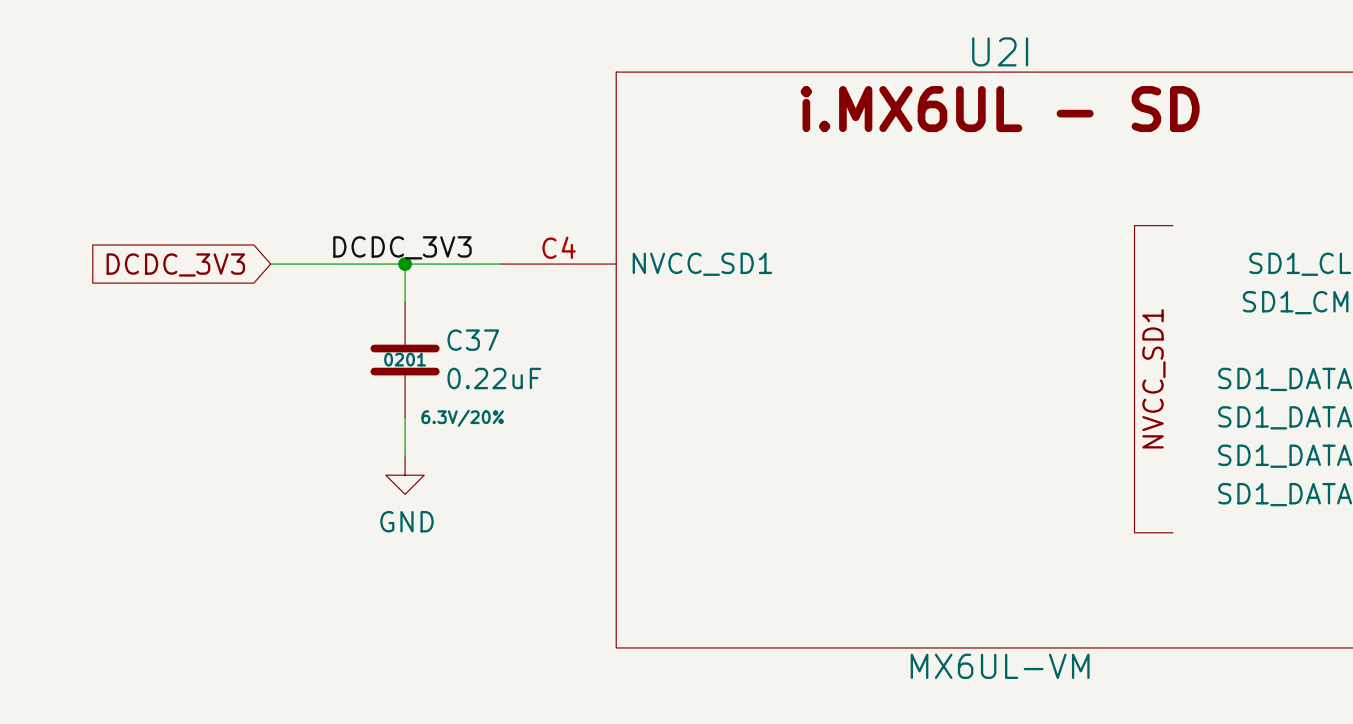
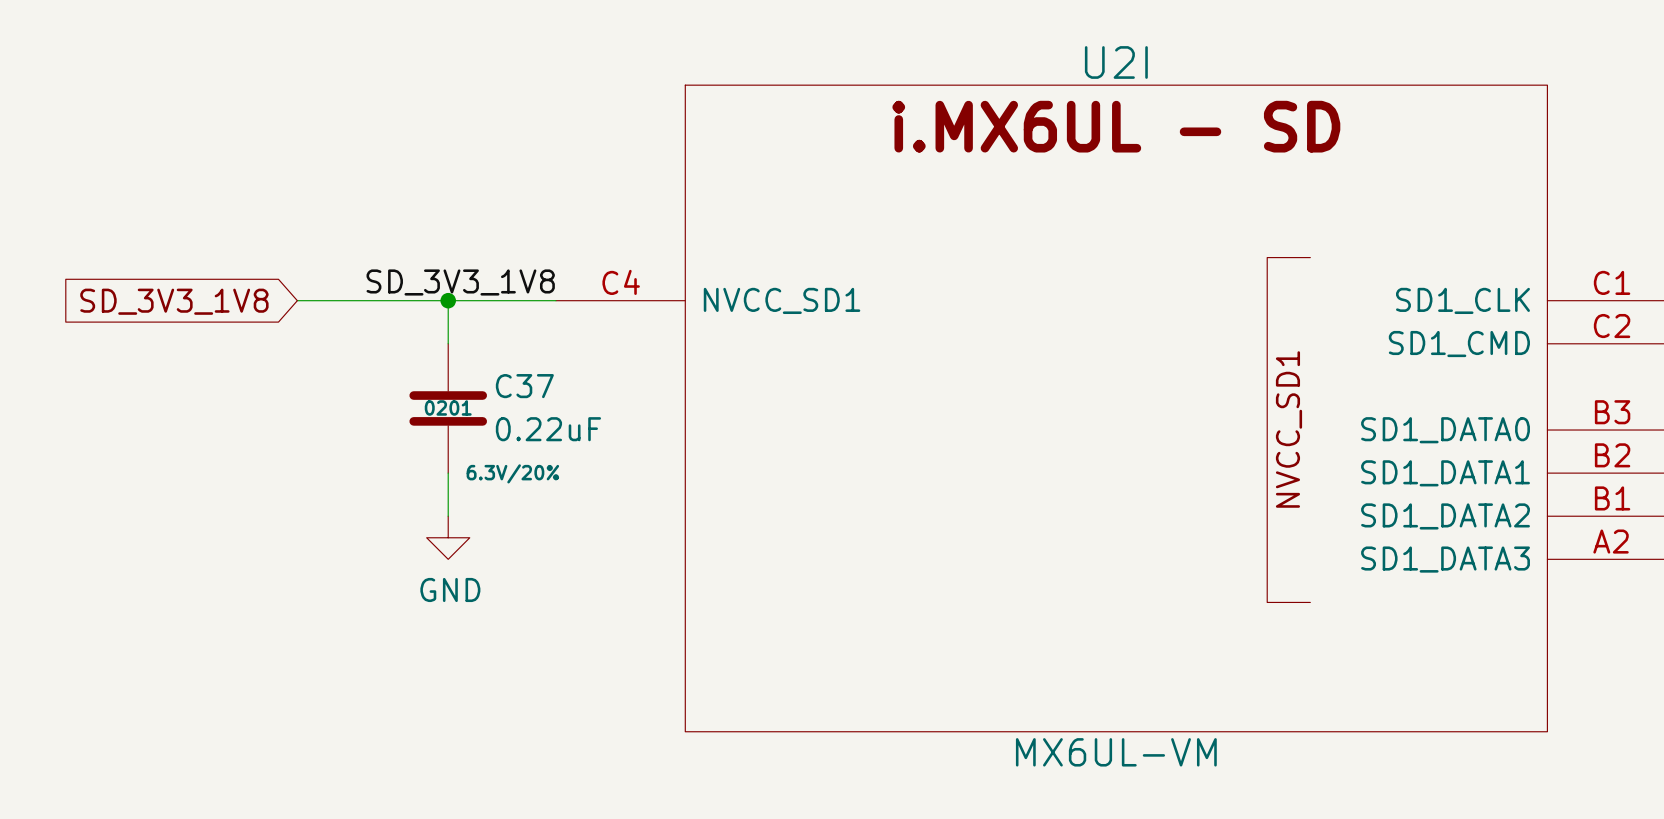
label: DCDC_3V3 (402, 247) -> SD_3V3_1V8 (460, 282)
global label: DCDC_3V3 (175, 264) -> SD_3V3_1V8 (174, 301)

